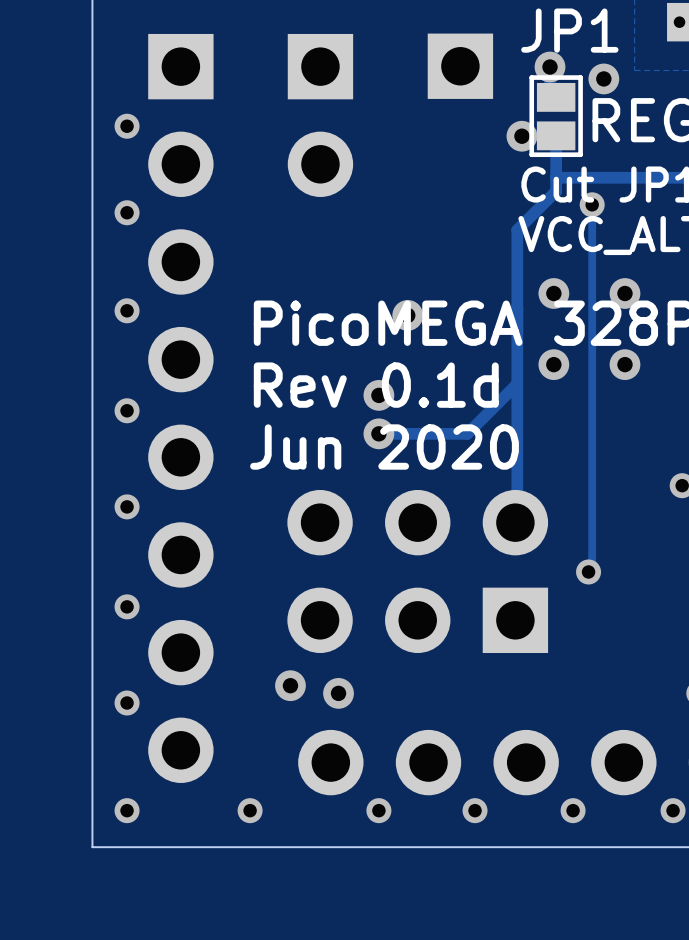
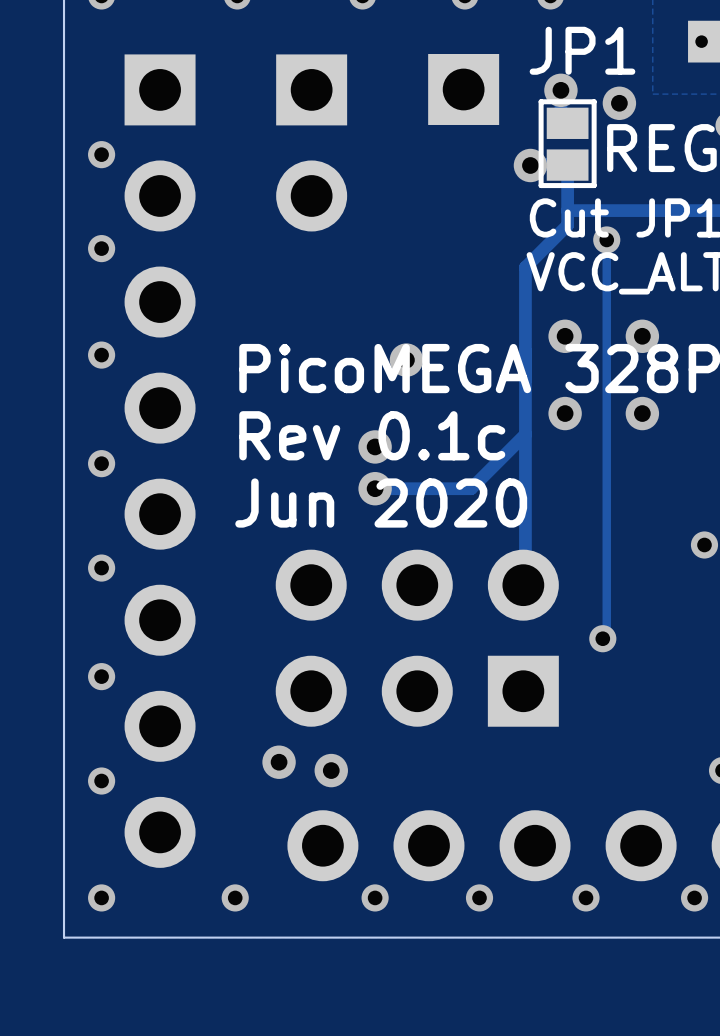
text: Rev 0.1d (376, 385) -> Rev 0.1c (372, 435)

